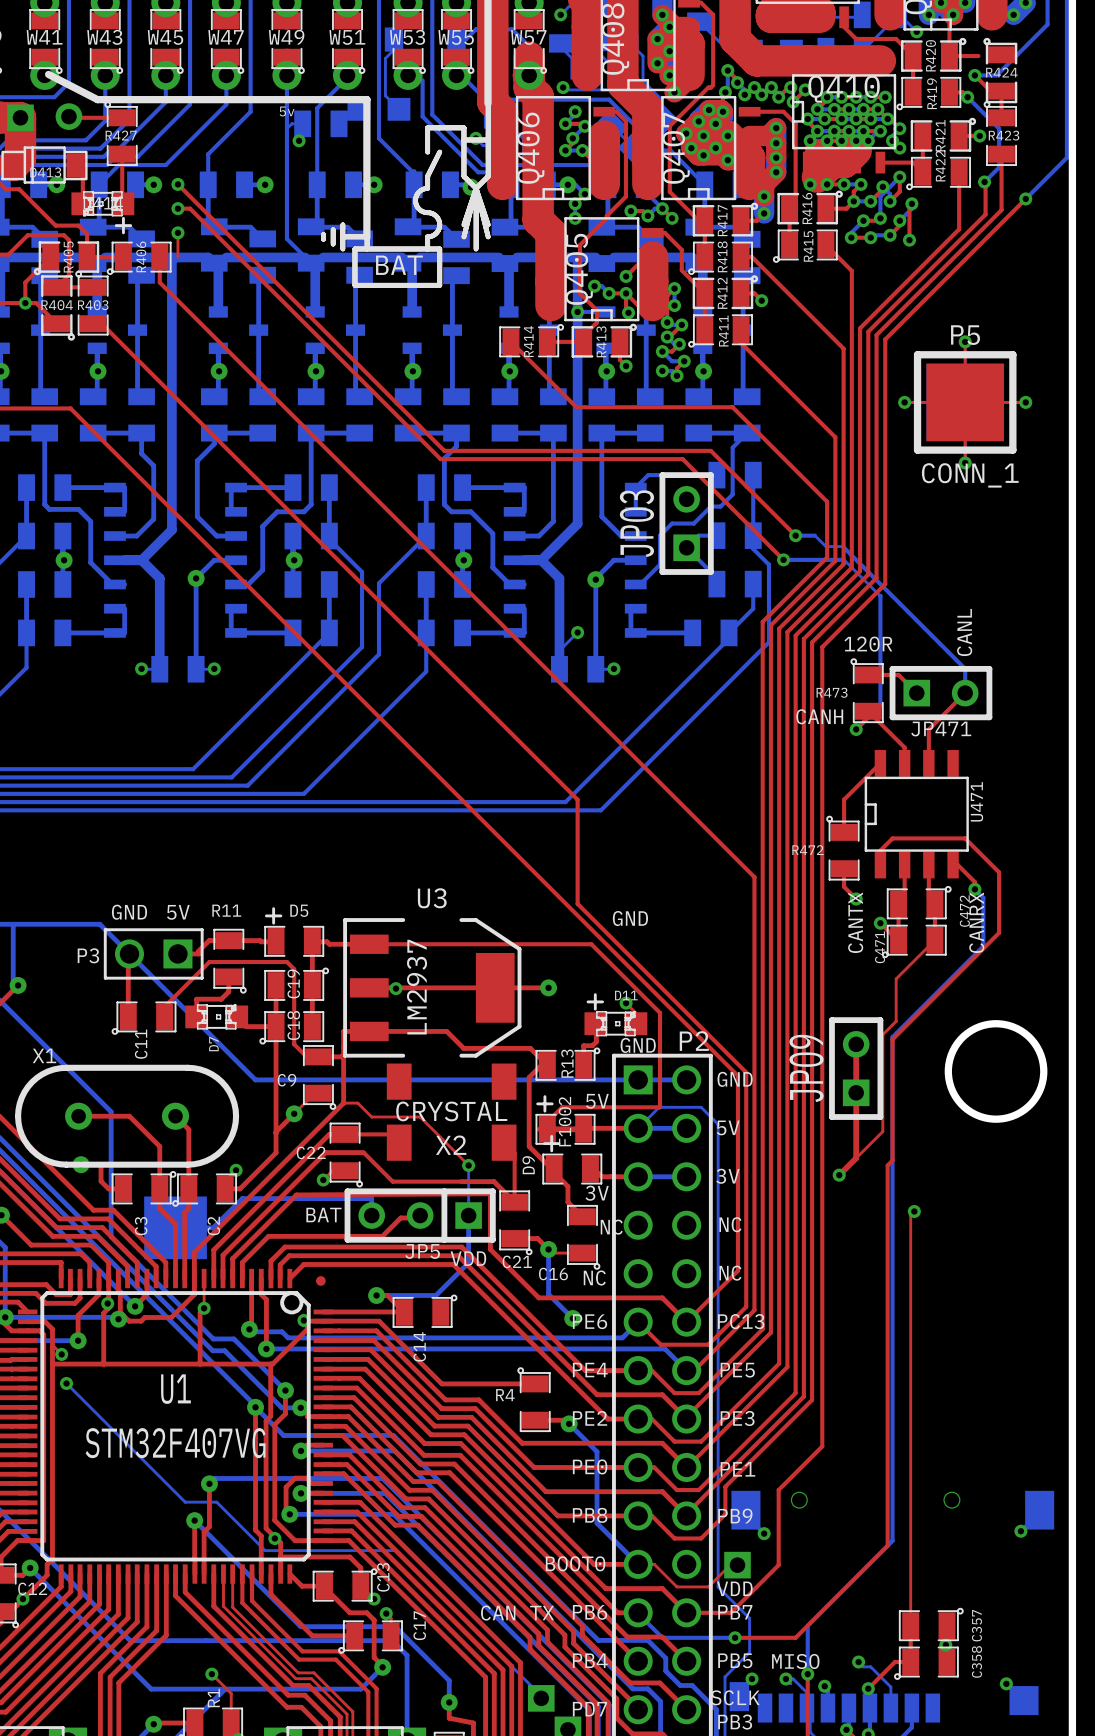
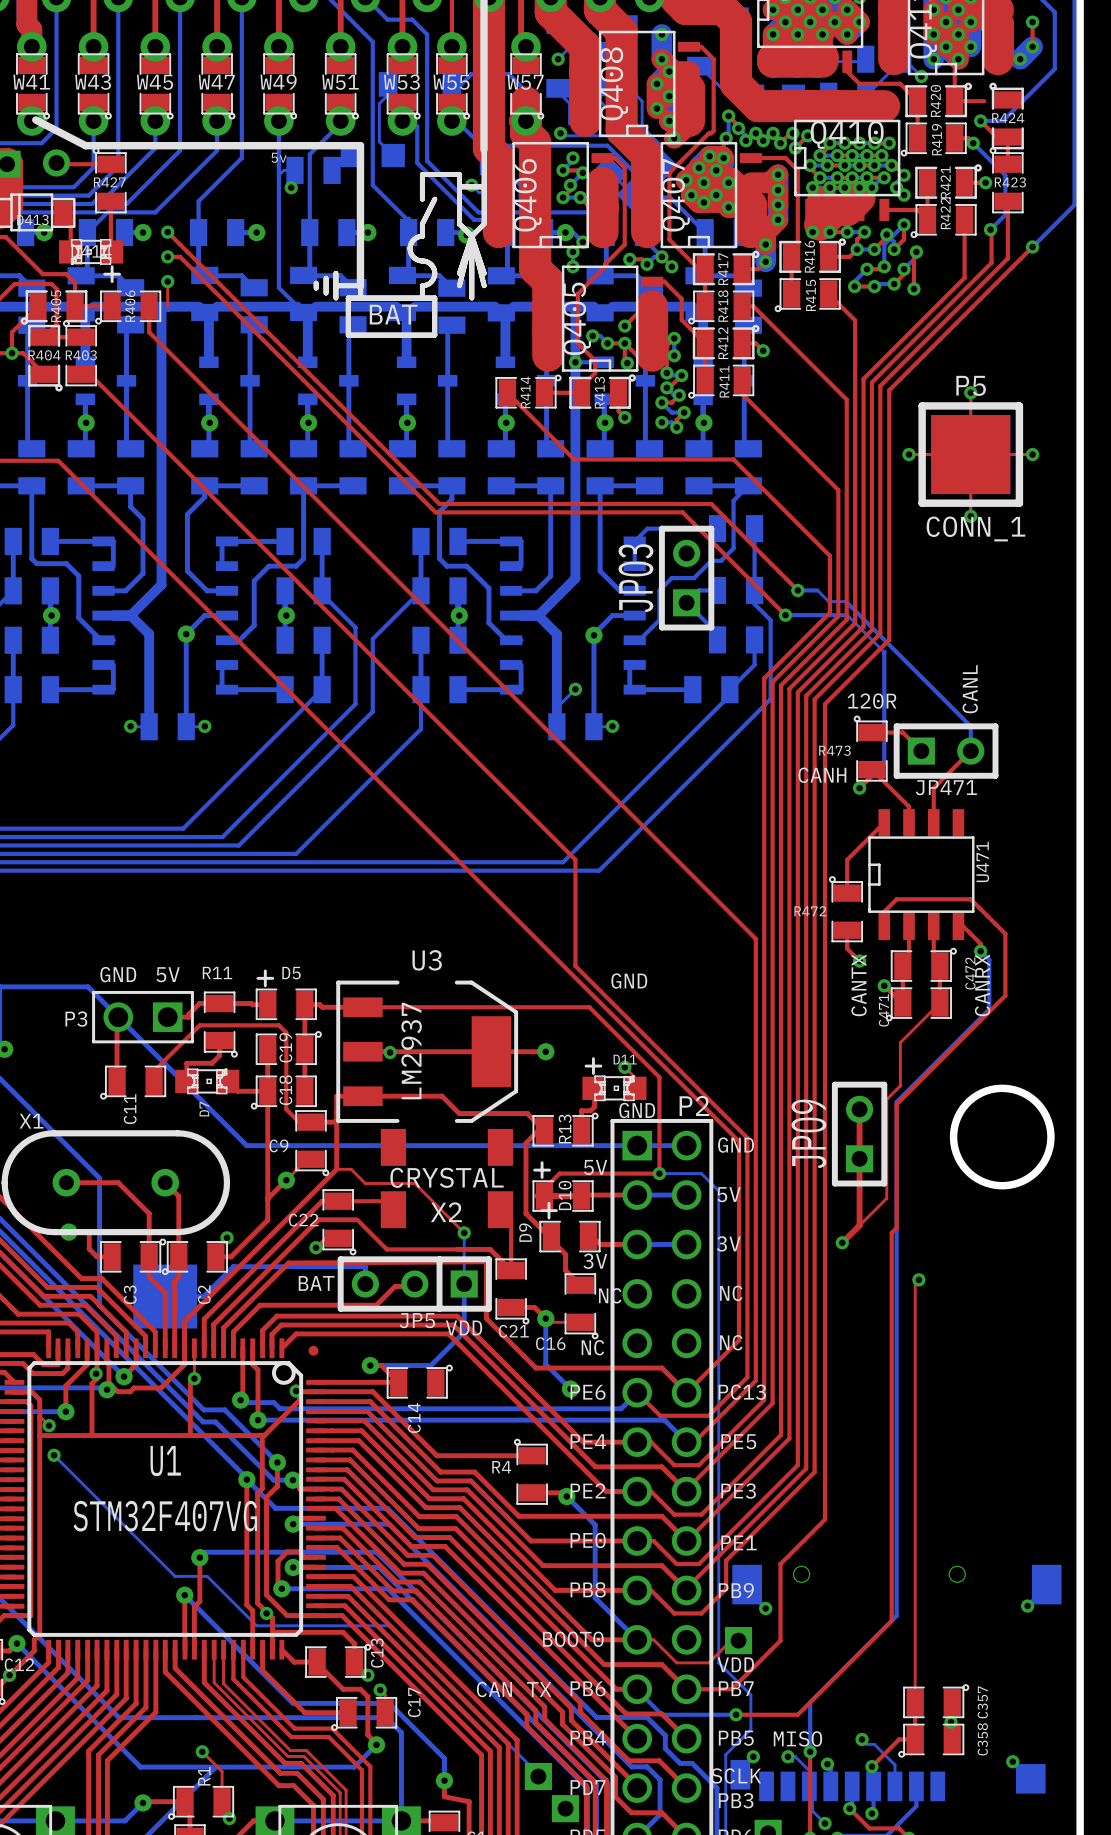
bottom track: (659, 1107) (638, 1128) -> none
via: none -> (659, 1173)
F1002 name: F1002 (565, 1121) -> D10 (565, 1195)

